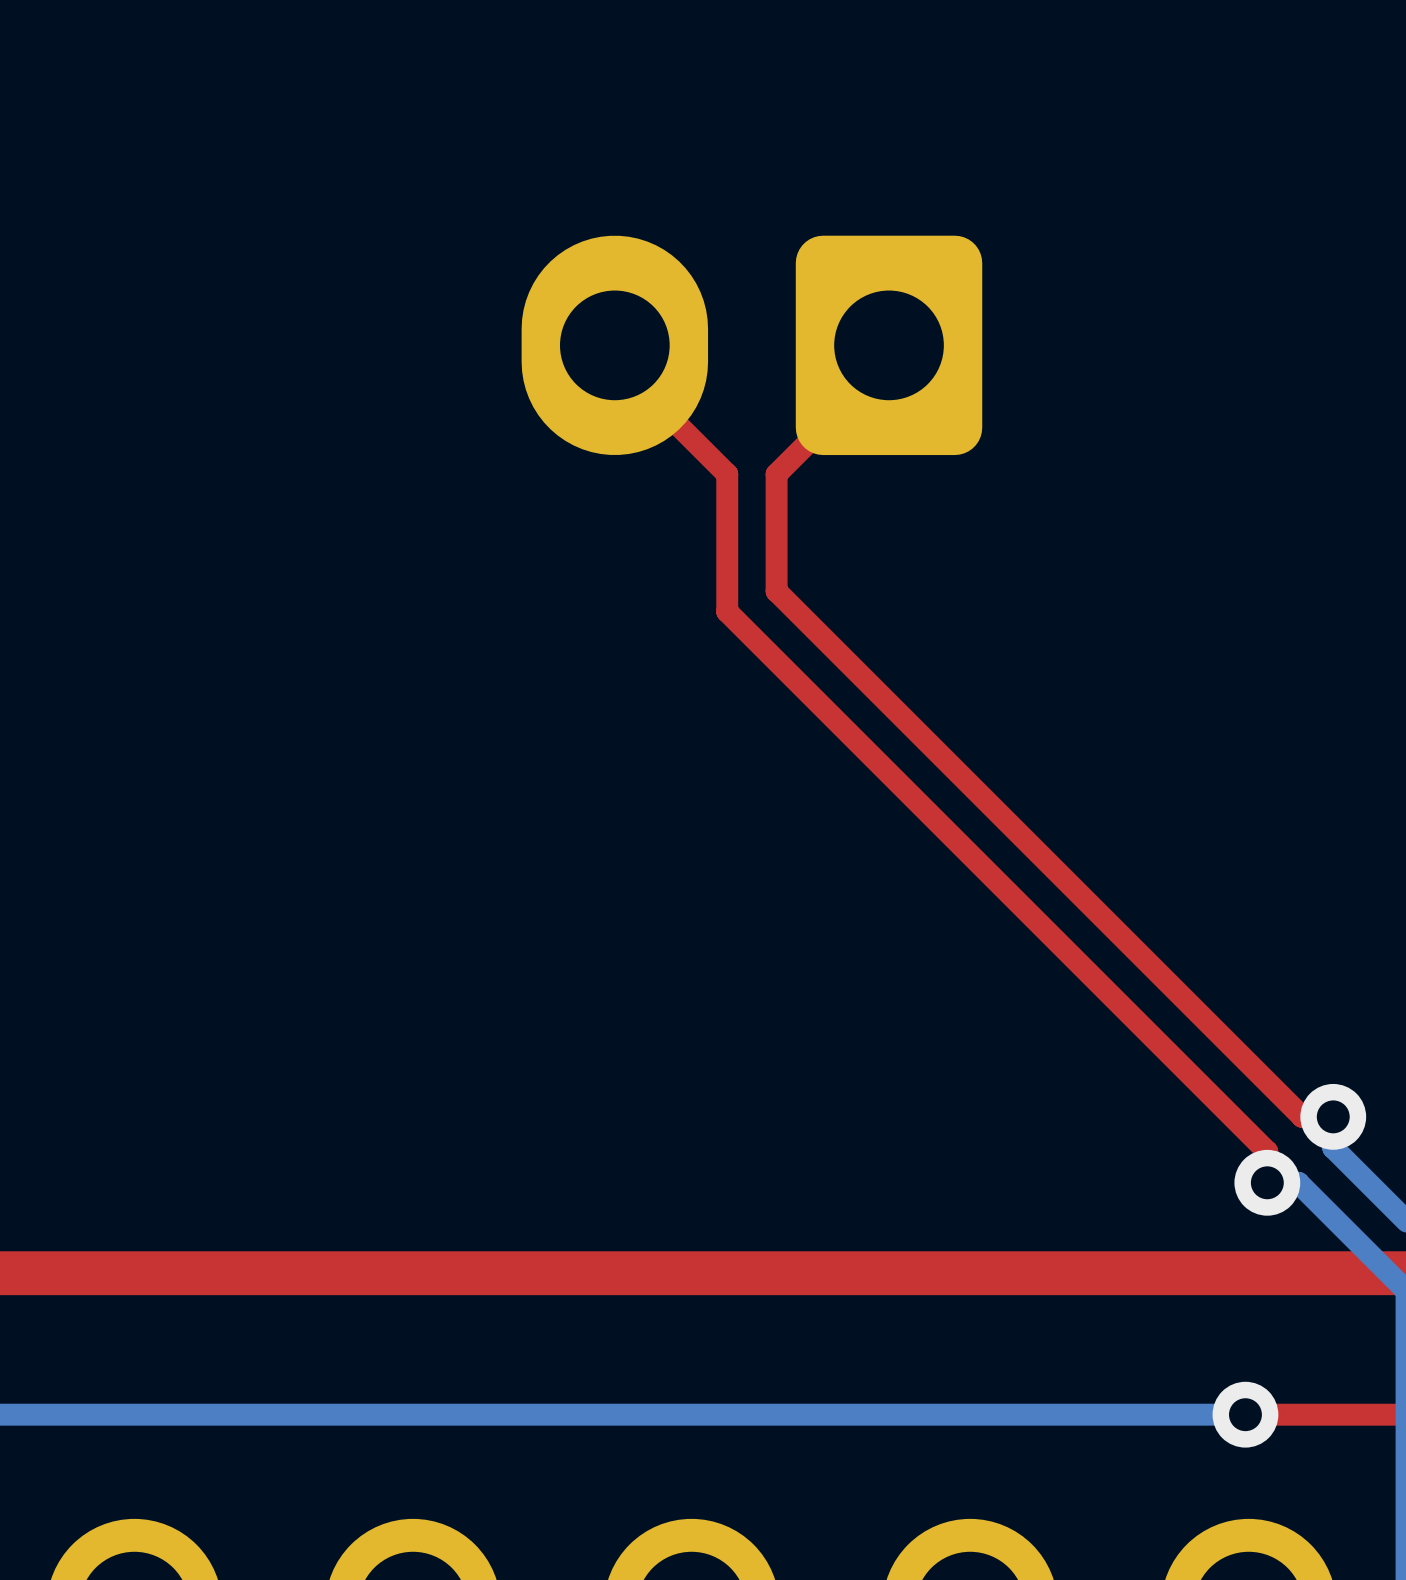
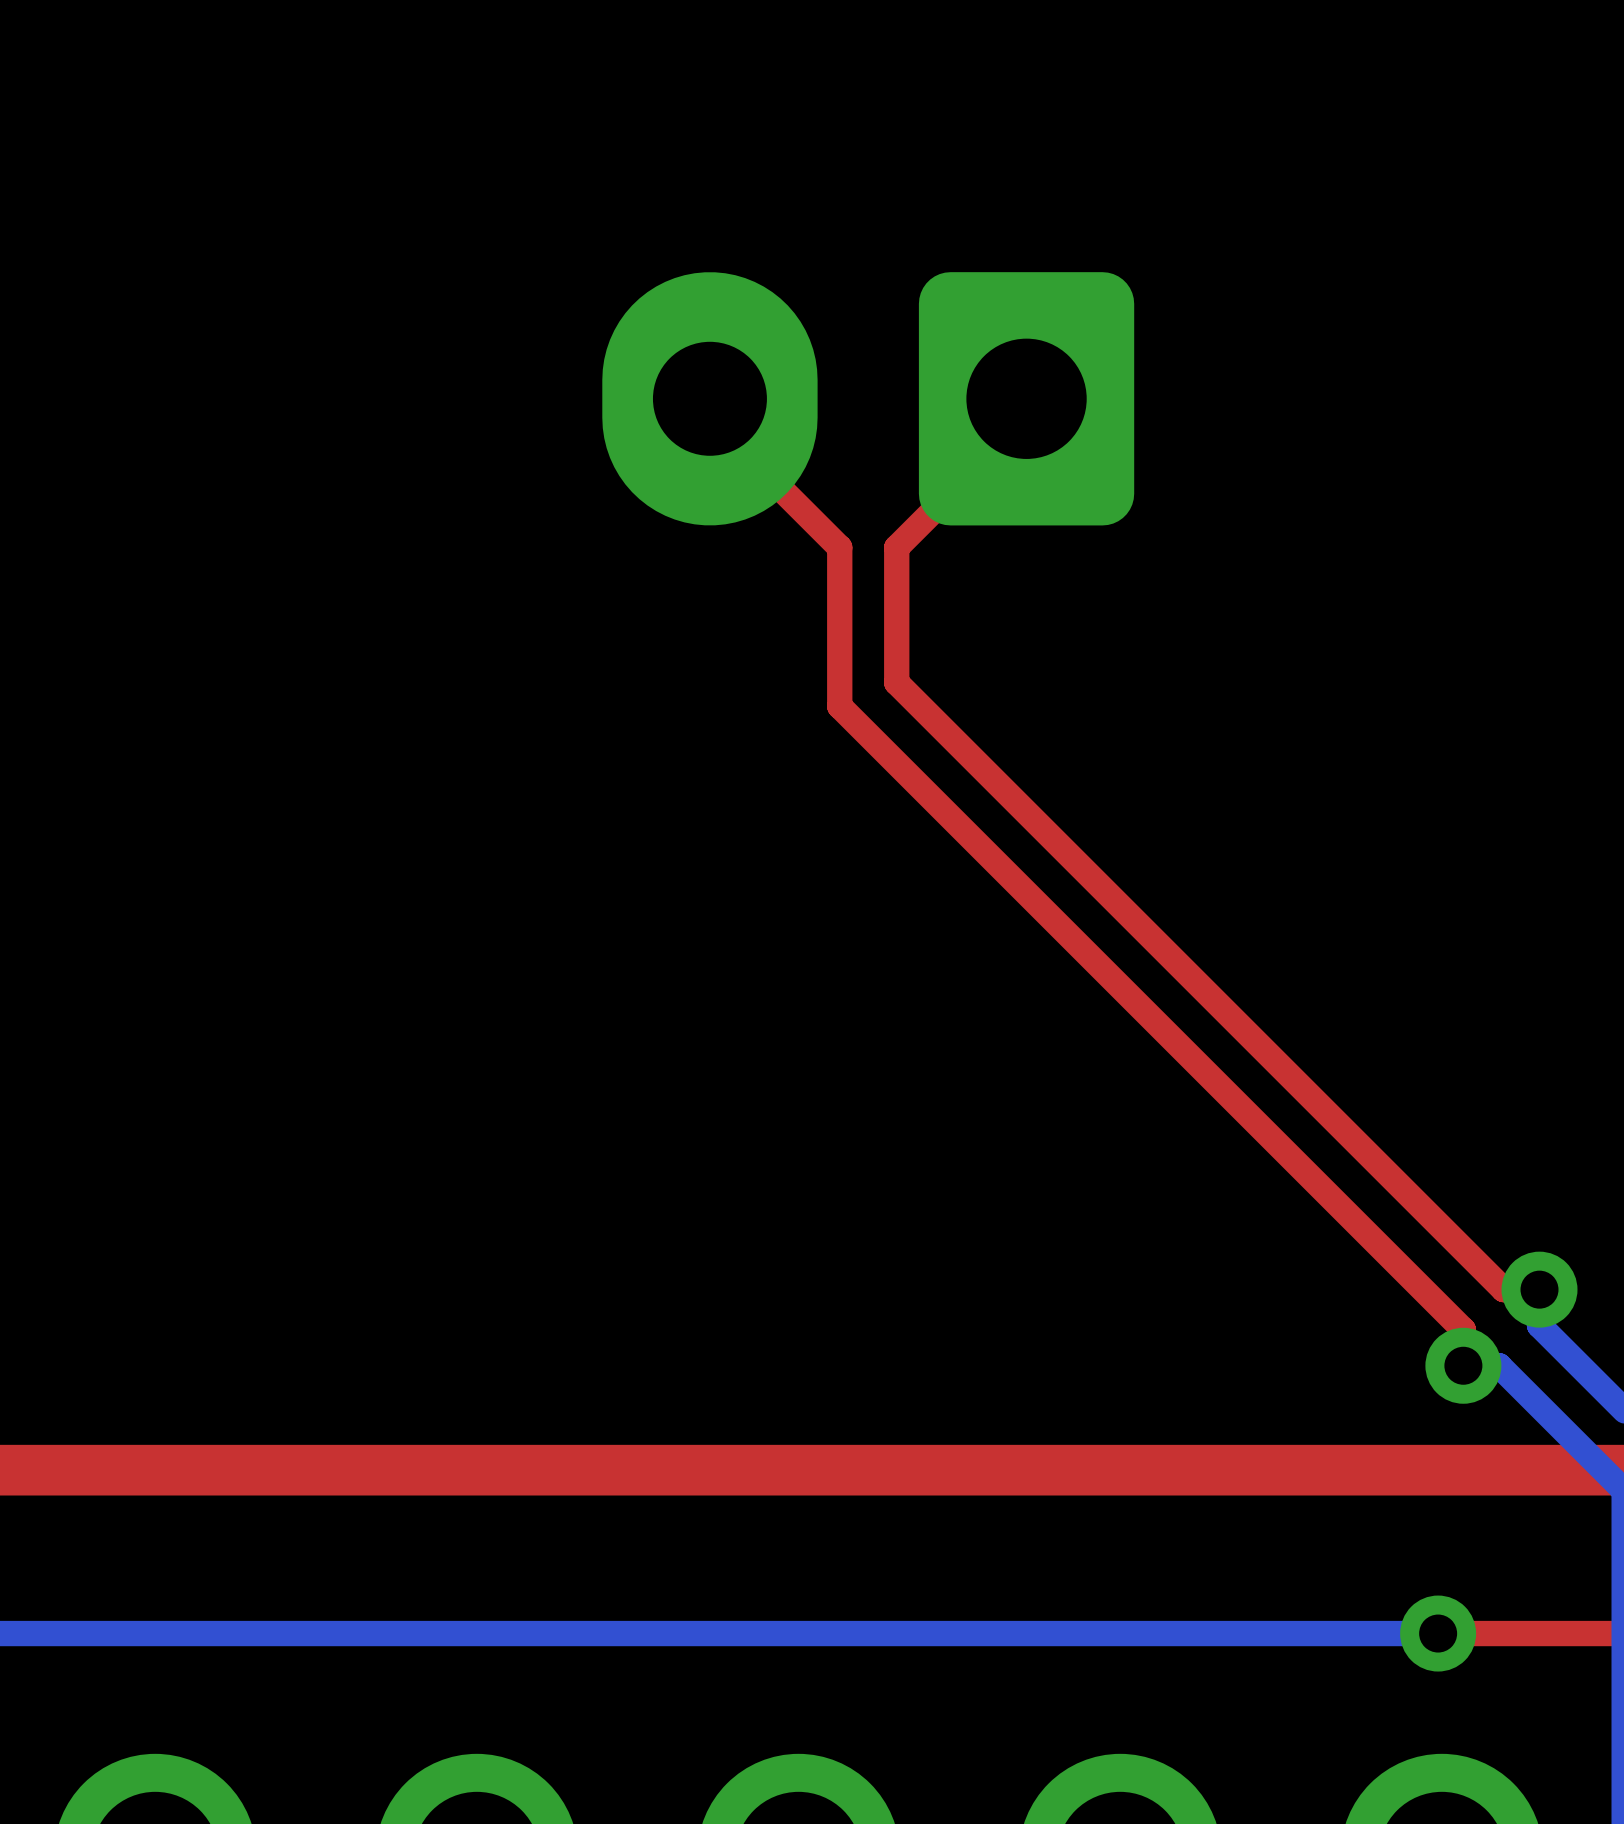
part footprint: [521, 235, 983, 456] -> [602, 272, 1135, 526]

